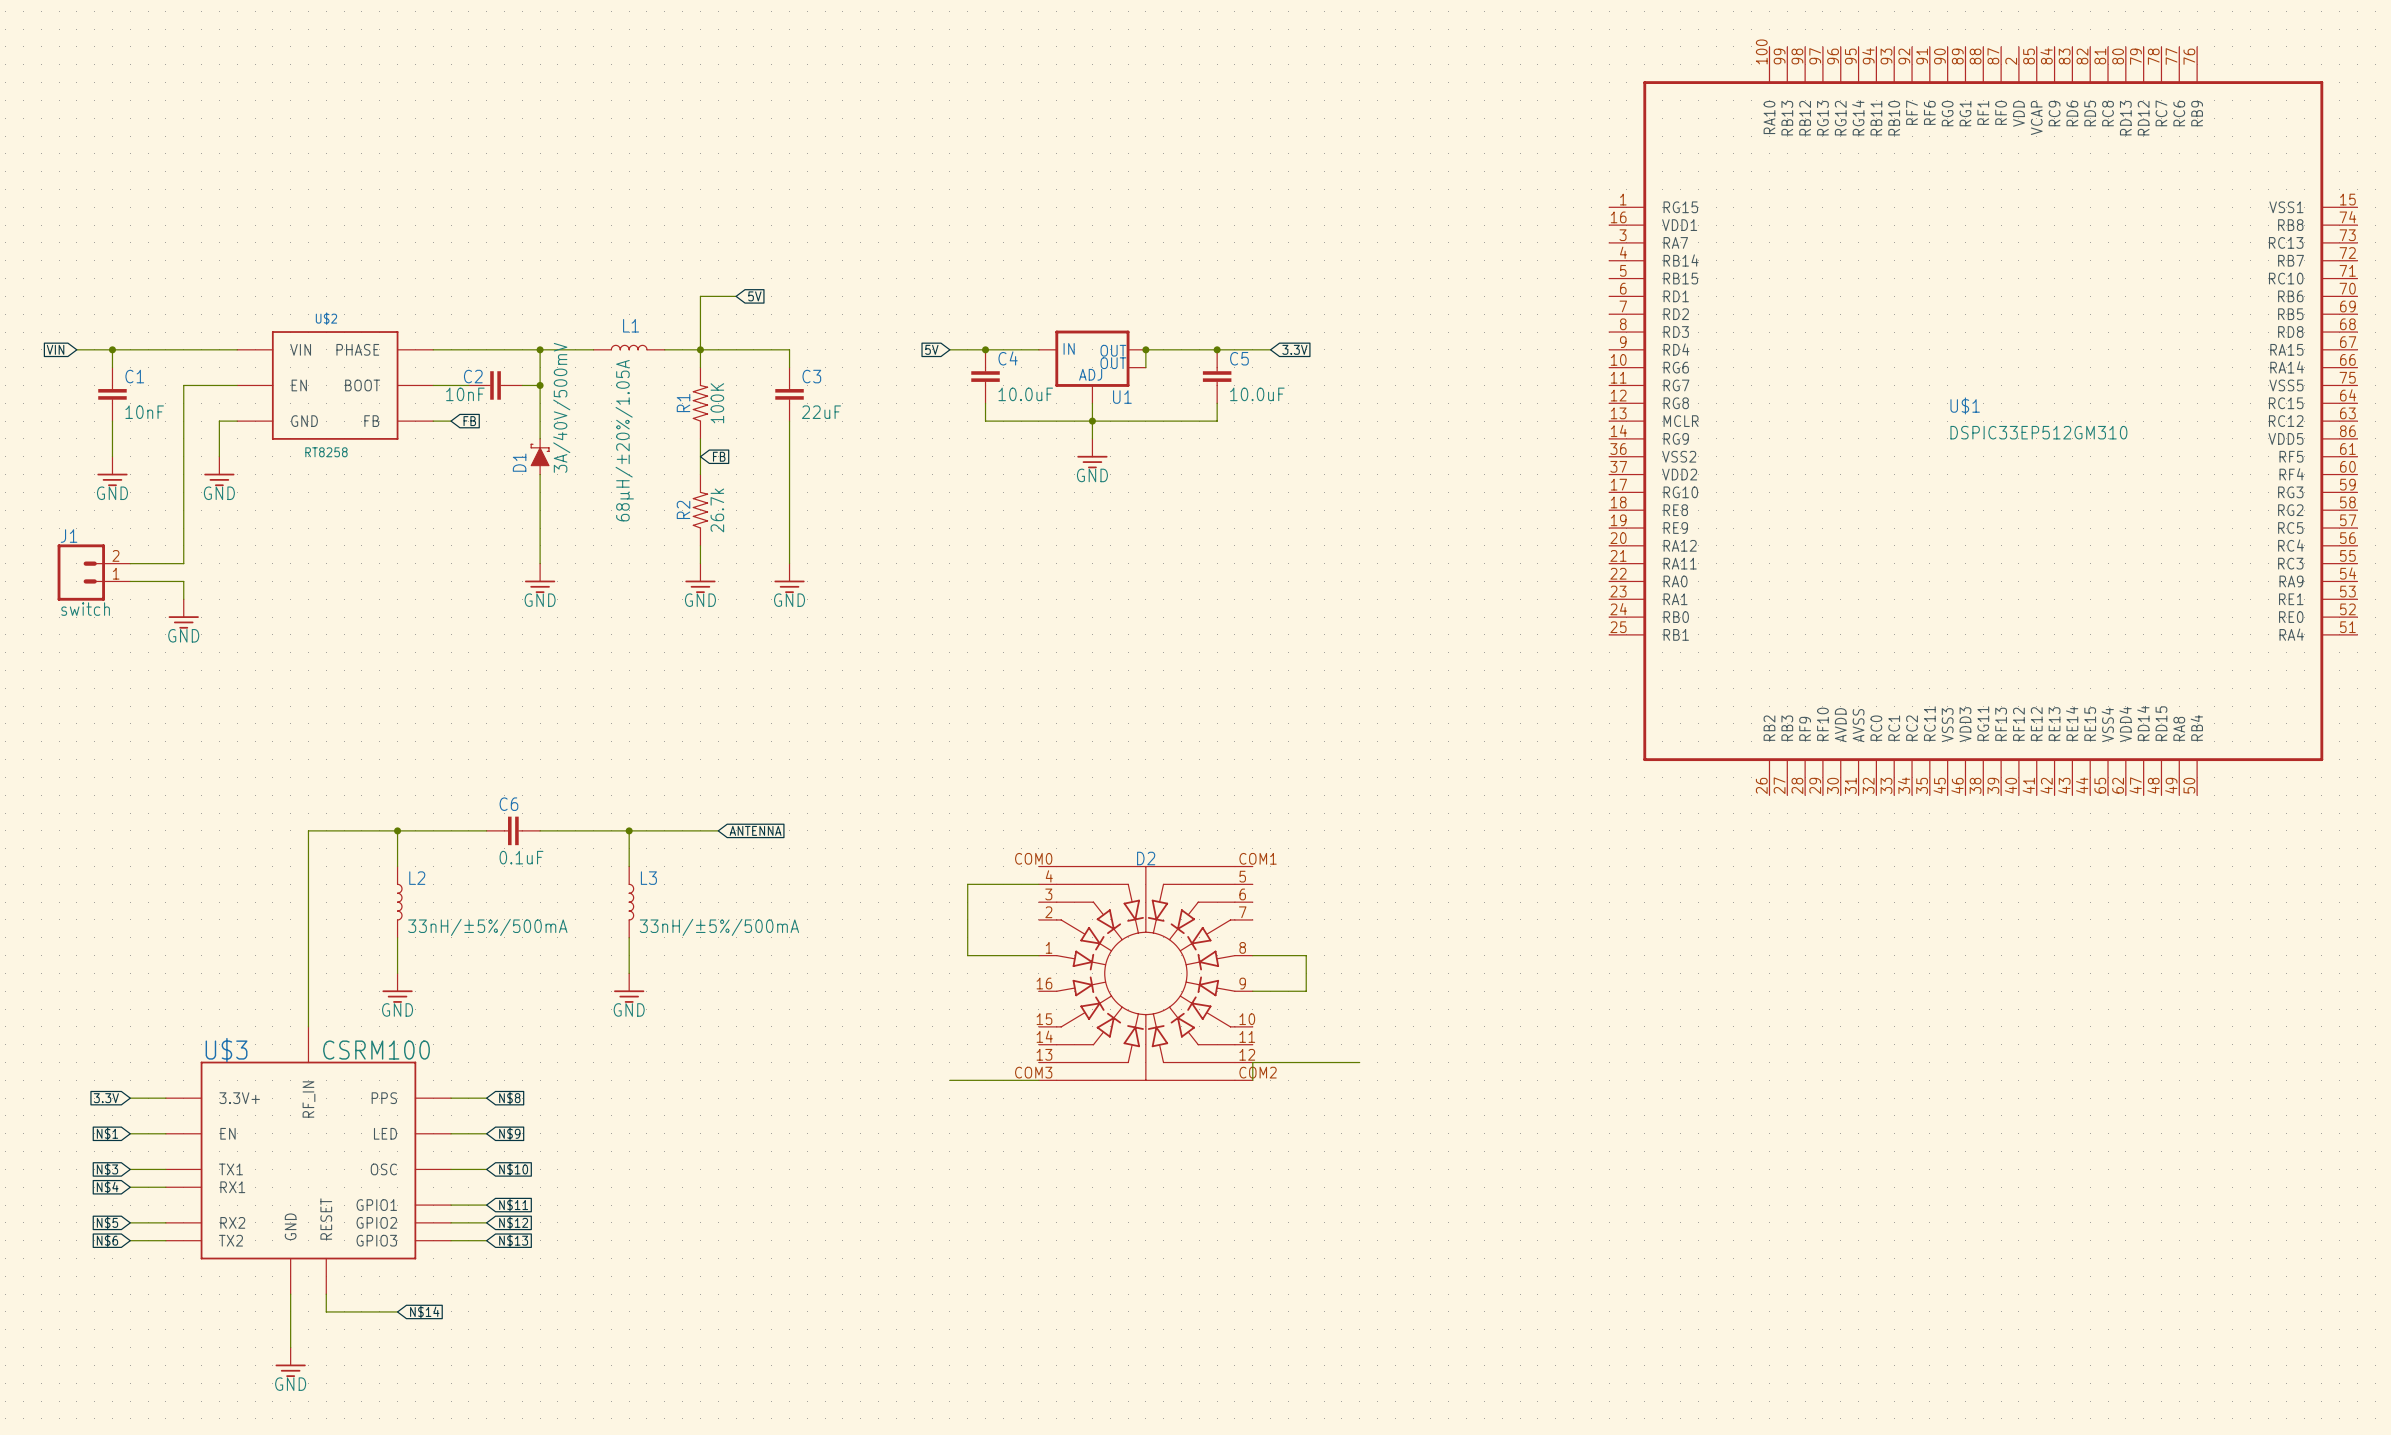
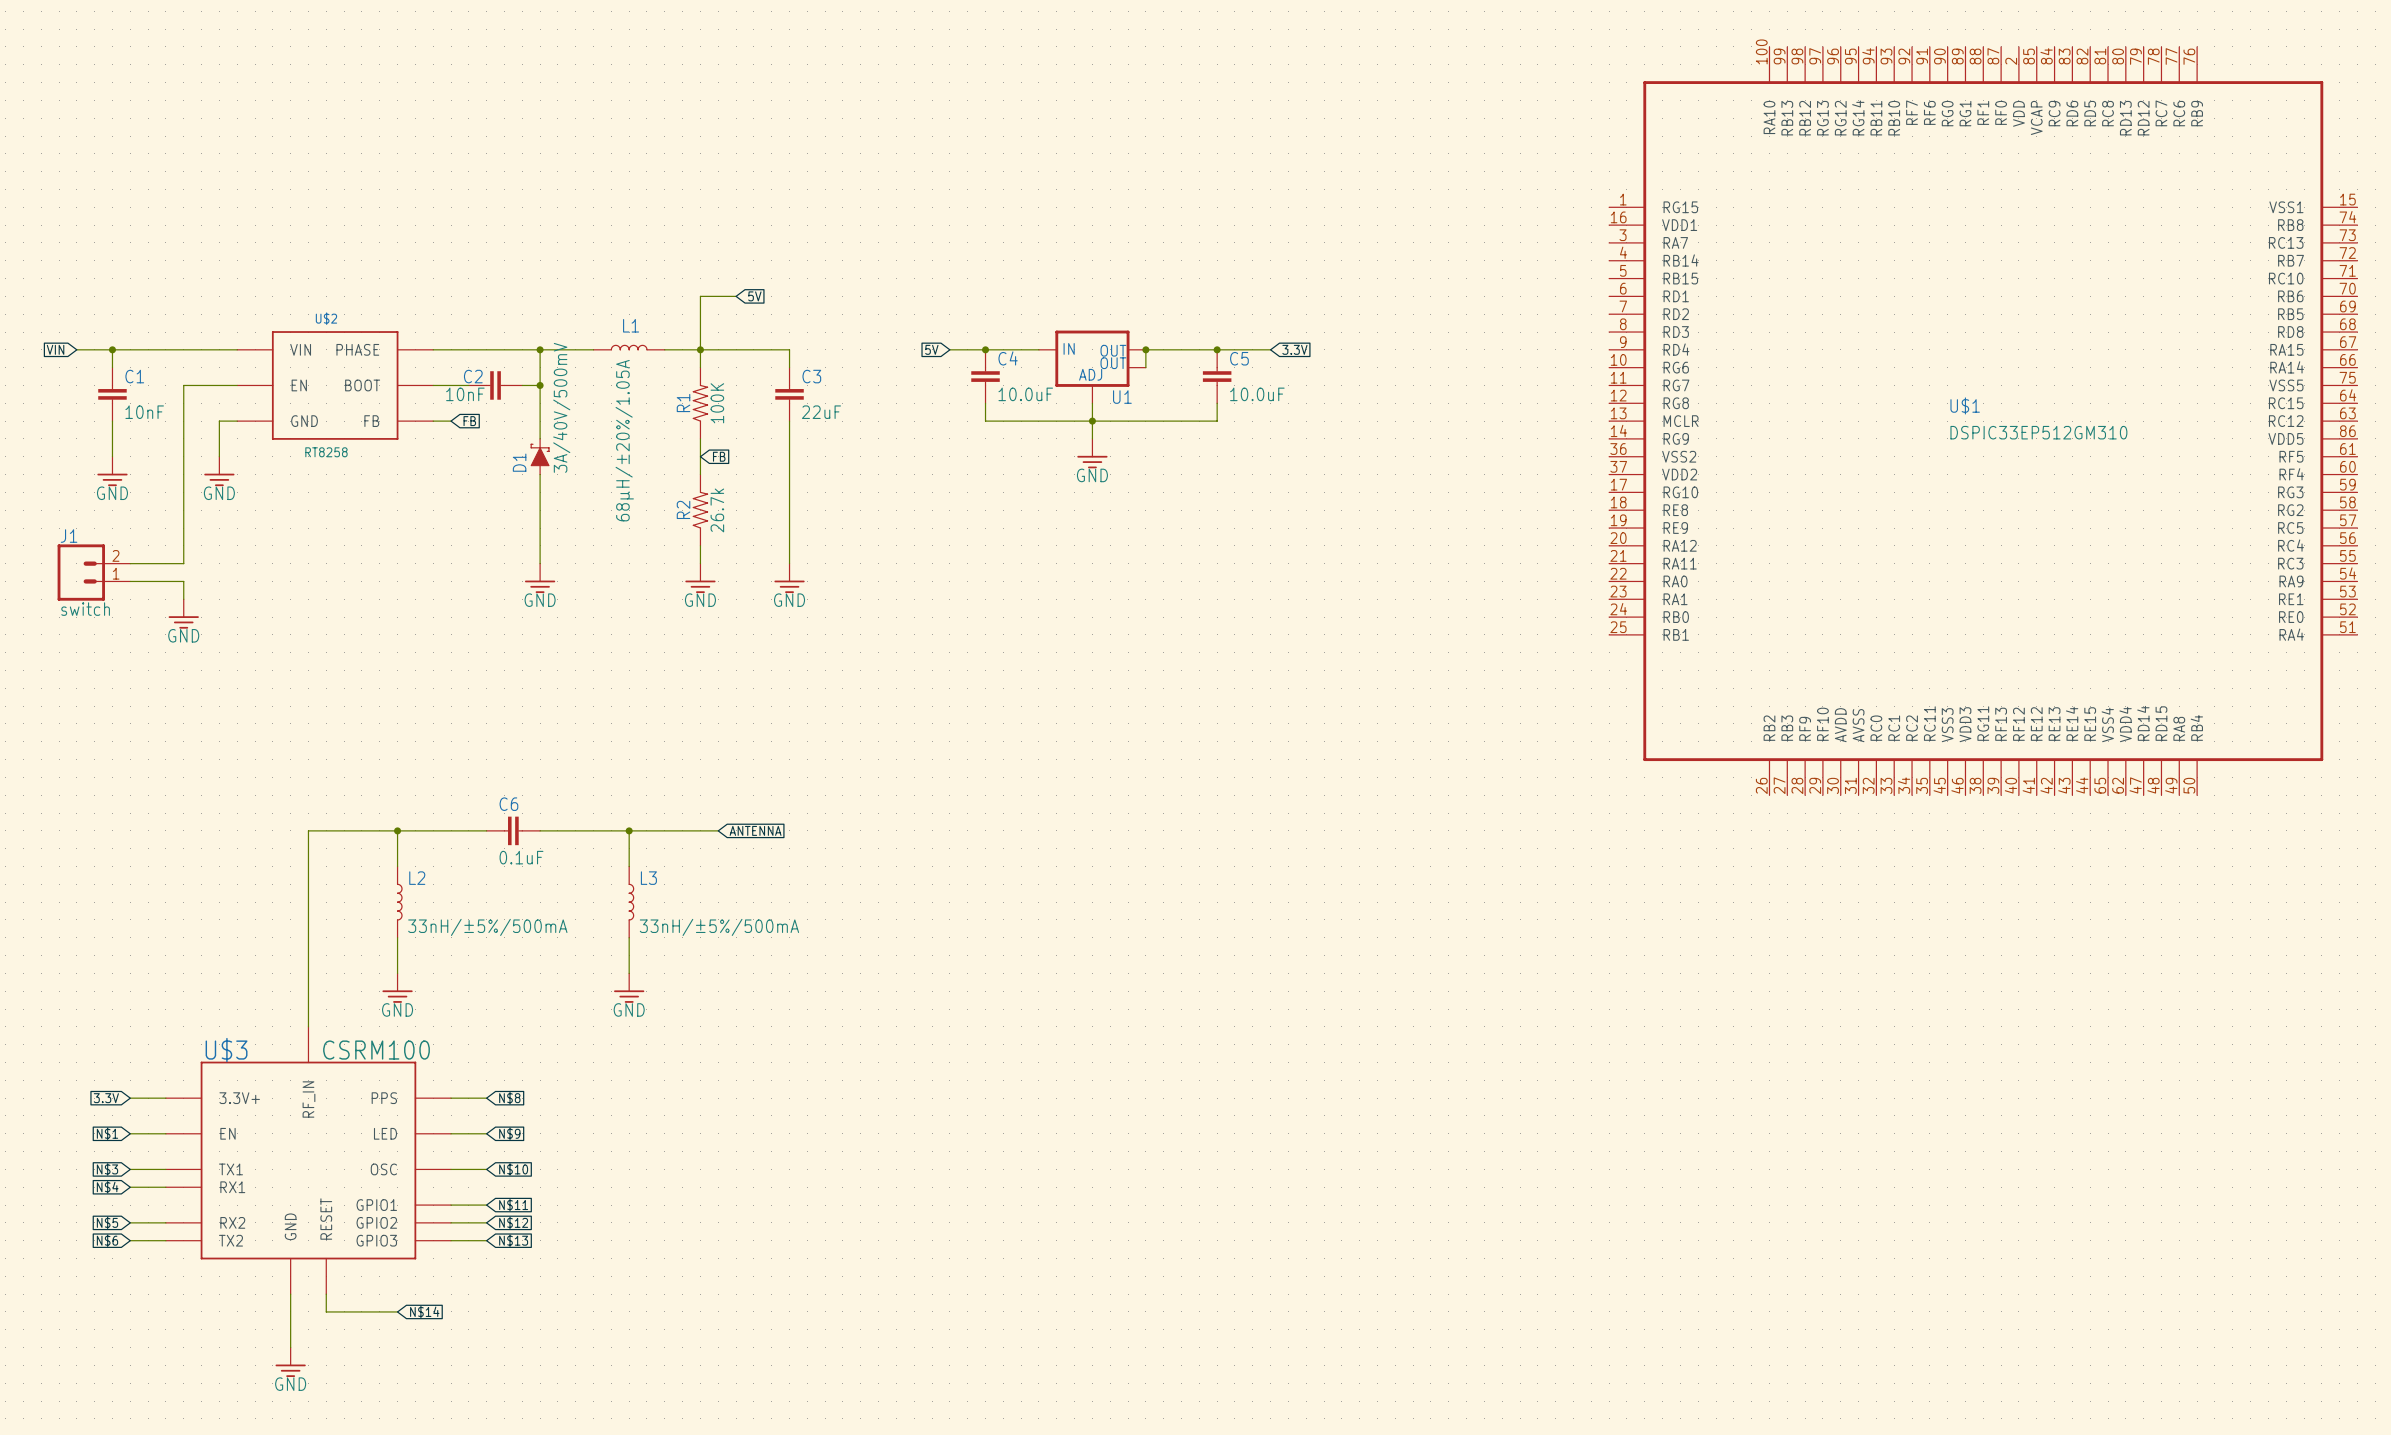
wire: (1038, 884) (967, 884) (967, 955) (1038, 955) -> none
wire: (1252, 955) (1306, 955) (1306, 991) (1252, 991) -> none
D2: (1145, 973) -> none
wire: (1359, 1062) (1252, 1062) (1252, 1080) -> none
wire: (949, 1080) (1038, 1080) -> none

